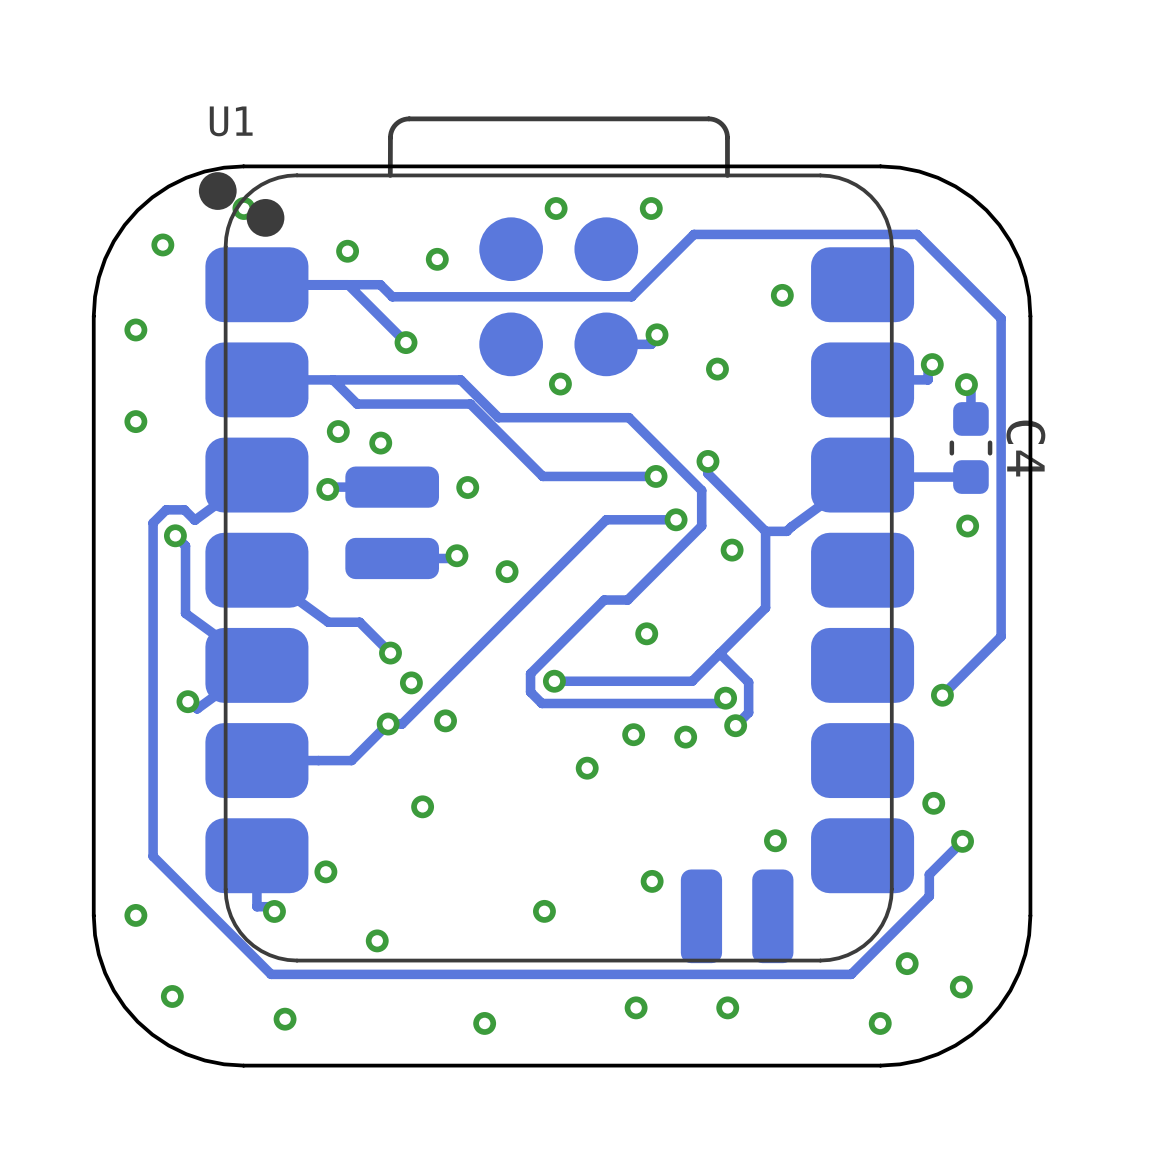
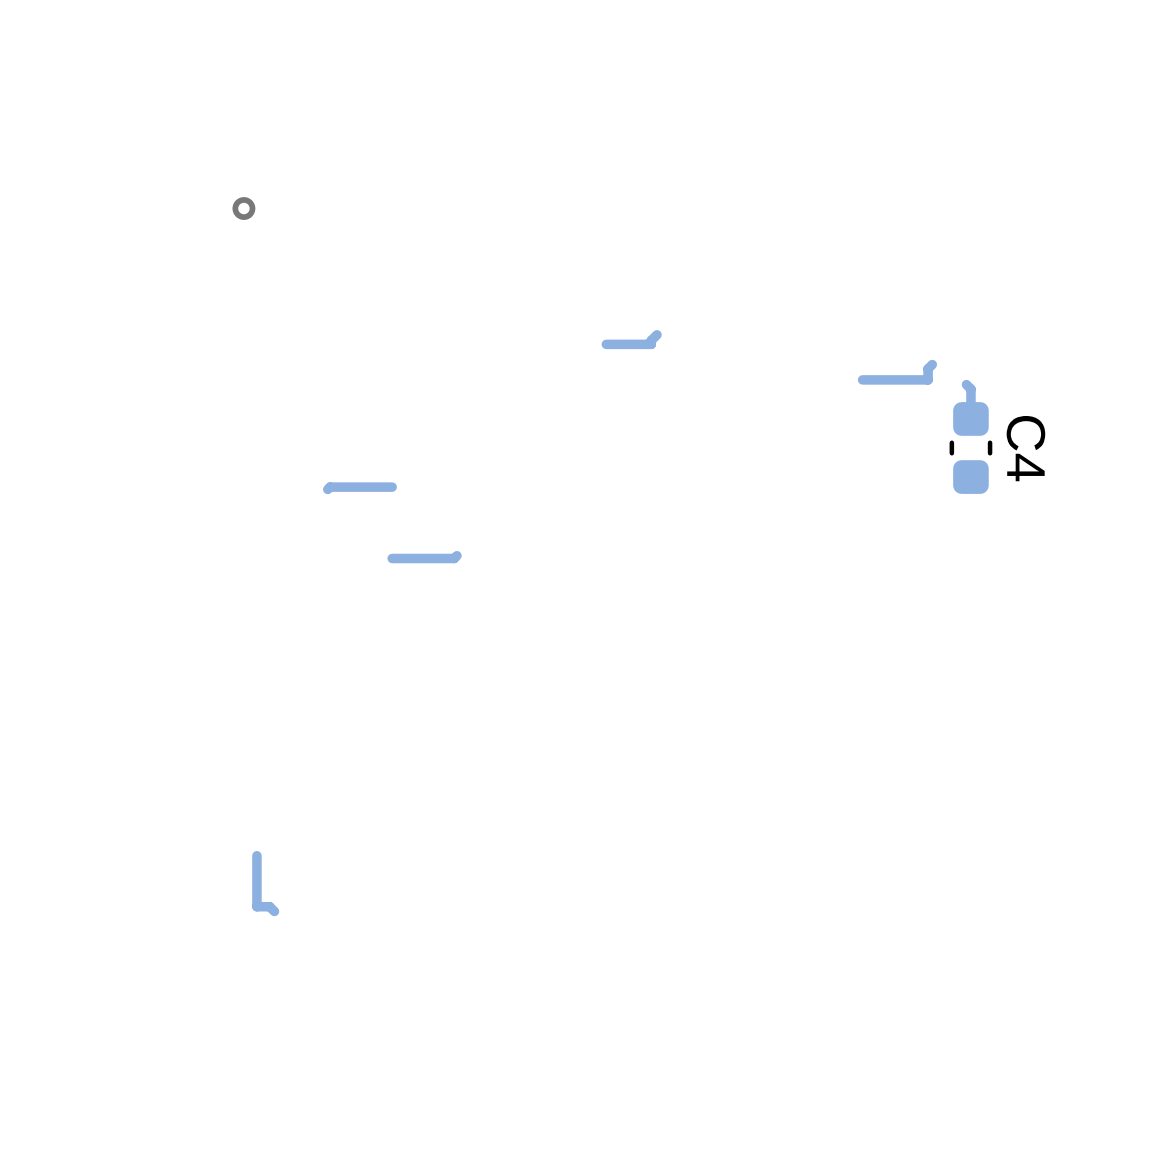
board edge: (880, 166) (224, 167) (186, 177) (168, 186) (137, 210) (124, 225) (105, 258) (98, 277) (93, 316) (93, 915) (98, 954) (113, 990) (124, 1006) (152, 1034) (186, 1054) (204, 1060) (243, 1065) (880, 1065) (919, 1060) (937, 1054) (971, 1034) (999, 1006) (1019, 973) (1025, 954) (1030, 915) (1029, 296) (1025, 277) (1010, 241) (999, 225) (971, 197) (937, 177) (919, 171) (880, 166) -> none
via: (556, 208) -> none
via: (651, 208) -> none
via: (162, 244) -> none
via: (347, 251) -> none
via: (437, 259) -> none
track: (256, 284) (380, 284) (392, 296) (631, 296) (693, 234) (917, 234) (1001, 318) (1001, 636) (942, 695) -> none
track: (348, 284) (406, 342) -> none
via: (782, 295) -> none
via: (135, 329) -> none
via: (657, 334) -> none
via: (406, 342) -> none
via: (932, 364) -> none
via: (717, 369) -> none
track: (256, 379) (460, 379) (498, 417) (628, 417) (701, 490) (701, 526) (627, 600) (604, 600) (530, 673) (530, 692) (541, 703) (720, 703) (725, 698) -> none
track: (333, 379) (357, 404) (470, 404) (542, 476) (656, 476) -> none
via: (560, 384) -> none
via: (966, 384) -> none
via: (135, 421) -> none
via: (338, 431) -> none
via: (380, 443) -> none
track: (707, 461) (707, 473) (765, 531) -> none
via: (707, 461) -> none
track: (256, 475) (194, 520) (184, 509) (166, 509) (153, 522) (153, 856) (271, 974) (851, 974) (929, 896) (929, 874) (962, 841) -> none
via: (656, 476) -> none
track: (970, 477) (864, 477) (862, 475) (786, 531) (765, 531) -> none
via: (467, 487) -> none
via: (327, 489) -> none
track: (676, 519) (606, 519) (402, 724) (388, 724) (351, 760) (256, 760) -> none
via: (676, 519) -> none
via: (967, 526) -> none
track: (765, 531) (765, 607) (692, 681) (554, 681) -> none
track: (175, 535) (185, 545) (185, 613) (256, 665) (197, 708) (187, 701) -> none
via: (175, 535) -> none
U1: (556, 539) -> none
via: (732, 550) -> none
via: (456, 555) -> none
track: (256, 570) (328, 622) (359, 622) (390, 653) -> none
via: (507, 571) -> none
via: (646, 633) -> none
via: (390, 653) -> none
track: (719, 653) (748, 682) (748, 712) (735, 725) -> none
via: (554, 681) -> none
via: (411, 682) -> none
via: (942, 695) -> none
via: (725, 698) -> none
via: (187, 701) -> none
via: (445, 720) -> none
via: (388, 724) -> none
via: (735, 725) -> none
via: (633, 734) -> none
via: (685, 737) -> none
via: (587, 768) -> none
via: (933, 803) -> none
via: (422, 806) -> none
via: (775, 840) -> none
via: (962, 841) -> none
via: (325, 871) -> none
via: (652, 881) -> none
via: (274, 911) -> none
via: (544, 911) -> none
via: (135, 915) -> none
via: (377, 940) -> none
via: (907, 963) -> none
via: (961, 987) -> none
via: (172, 996) -> none
via: (636, 1007) -> none
via: (727, 1007) -> none
via: (285, 1019) -> none
via: (484, 1023) -> none
via: (880, 1023) -> none

